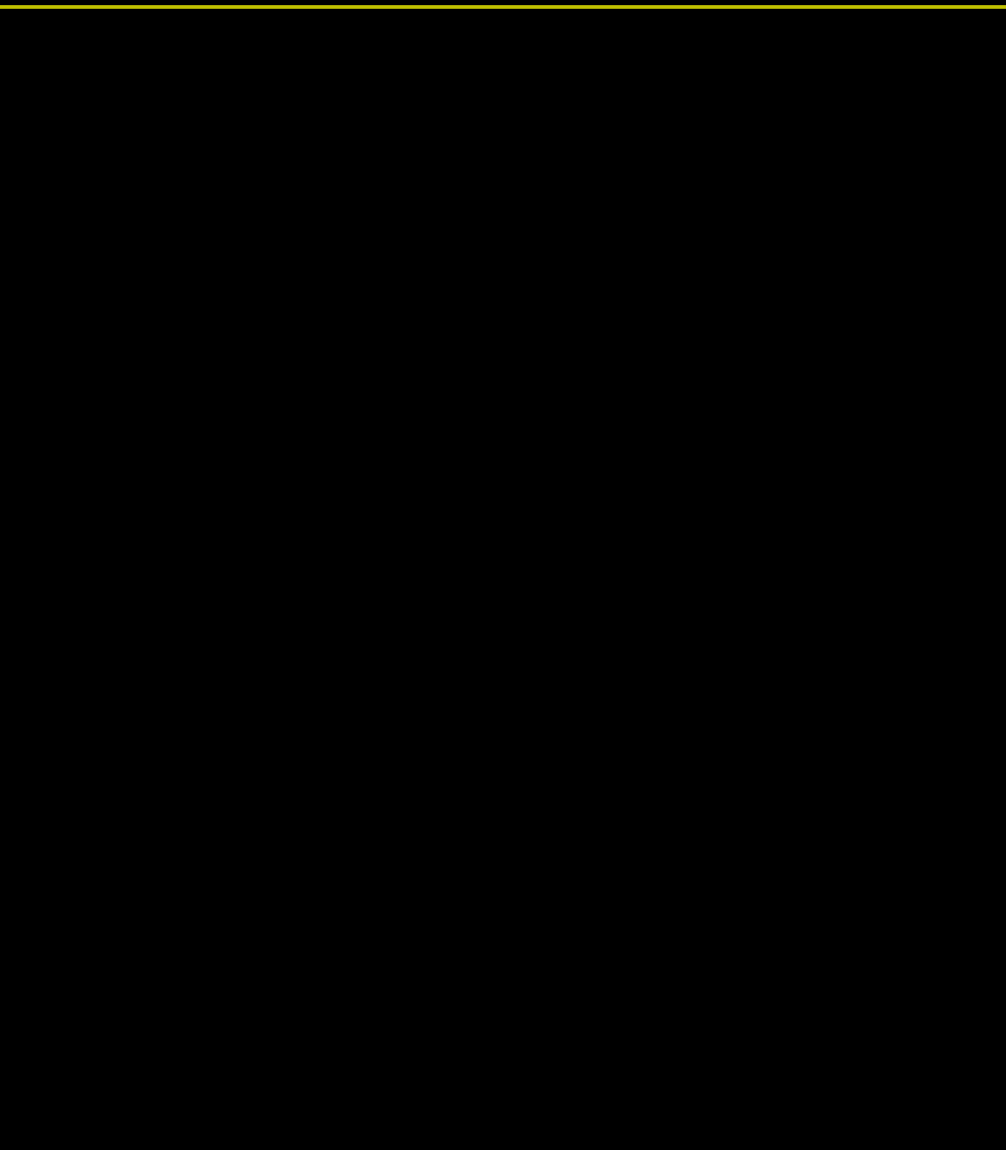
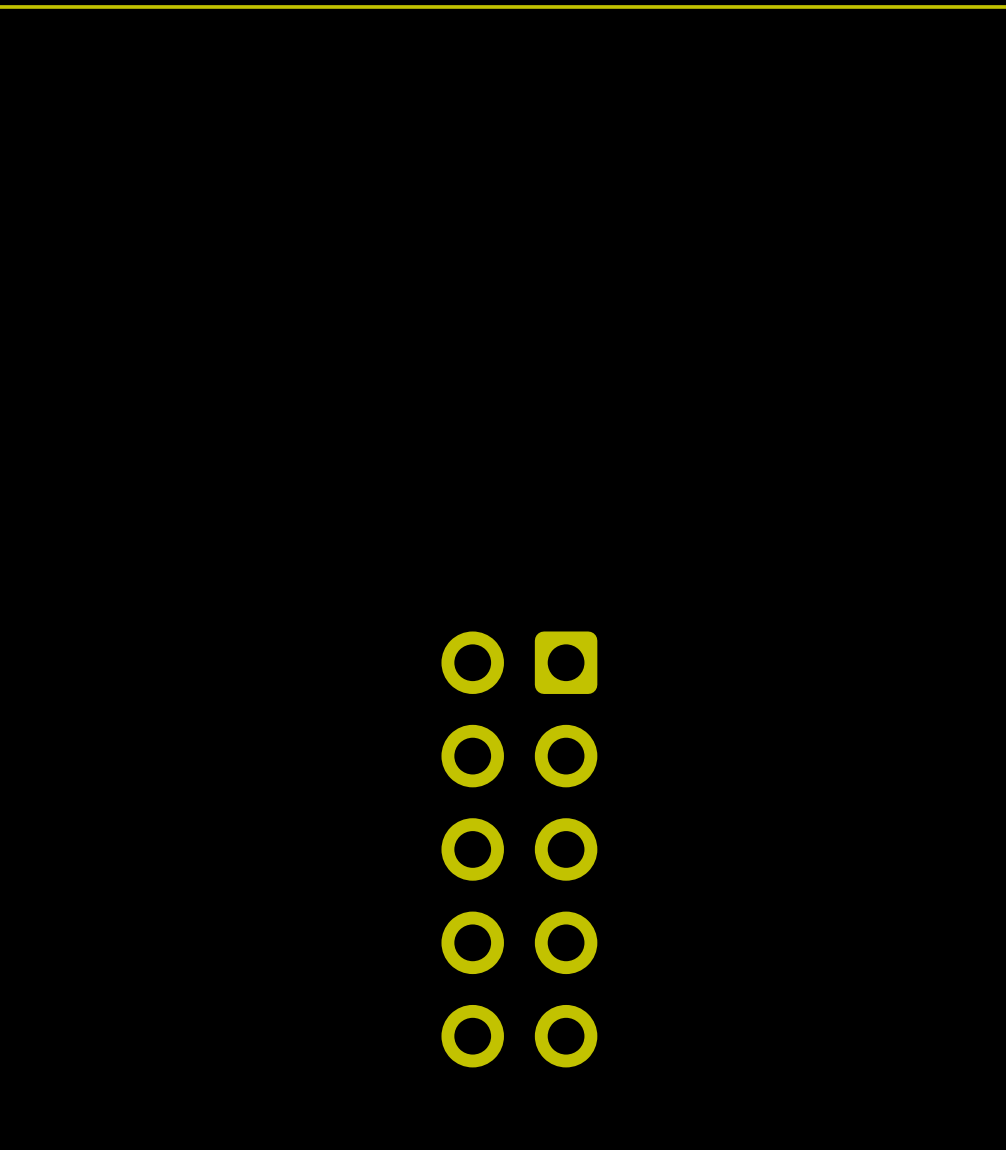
part: none -> (519, 849)

